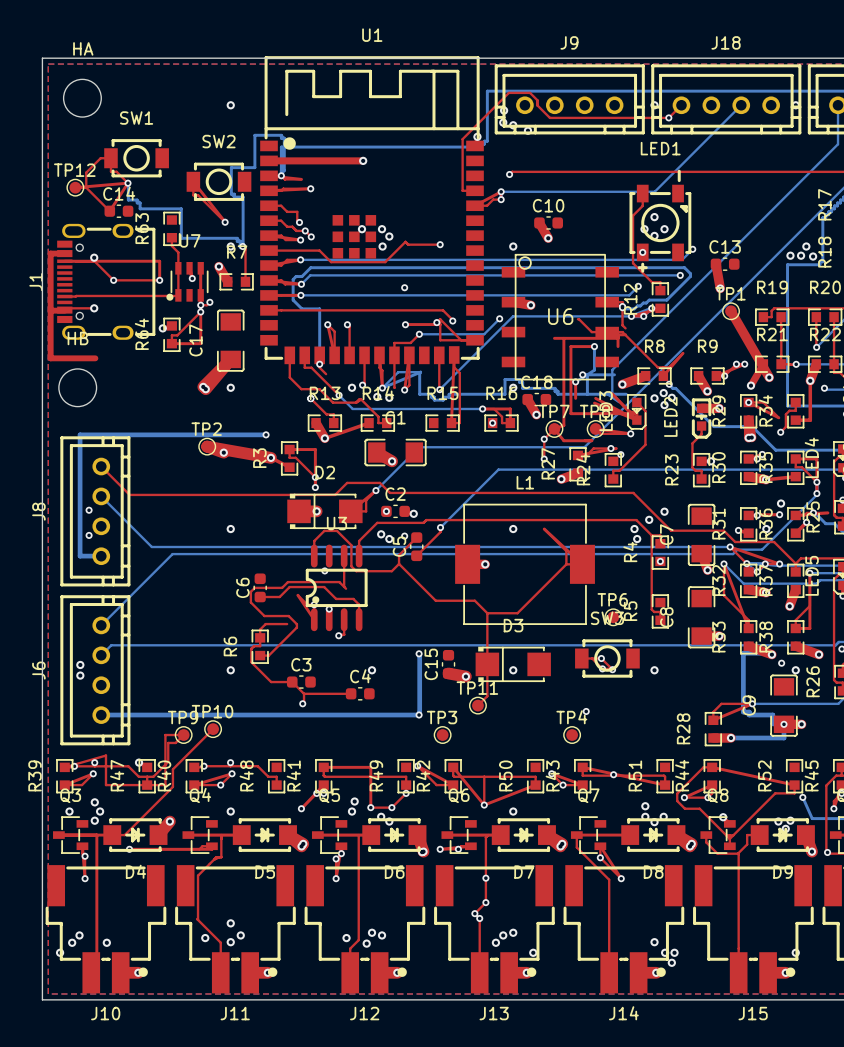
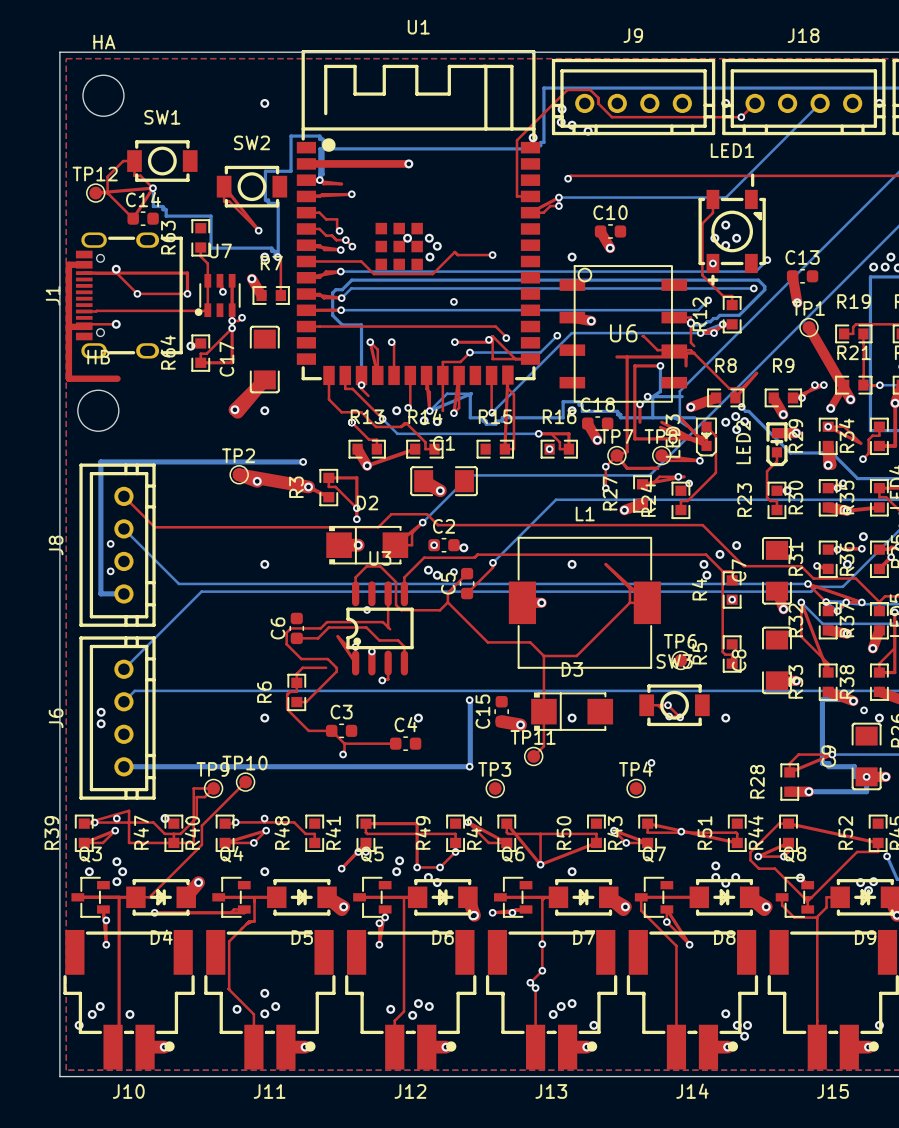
via: (205, 389) -> none
via: (751, 437) -> none
via: (301, 846) -> none
via: (560, 846) -> none
via: (689, 846) -> none

